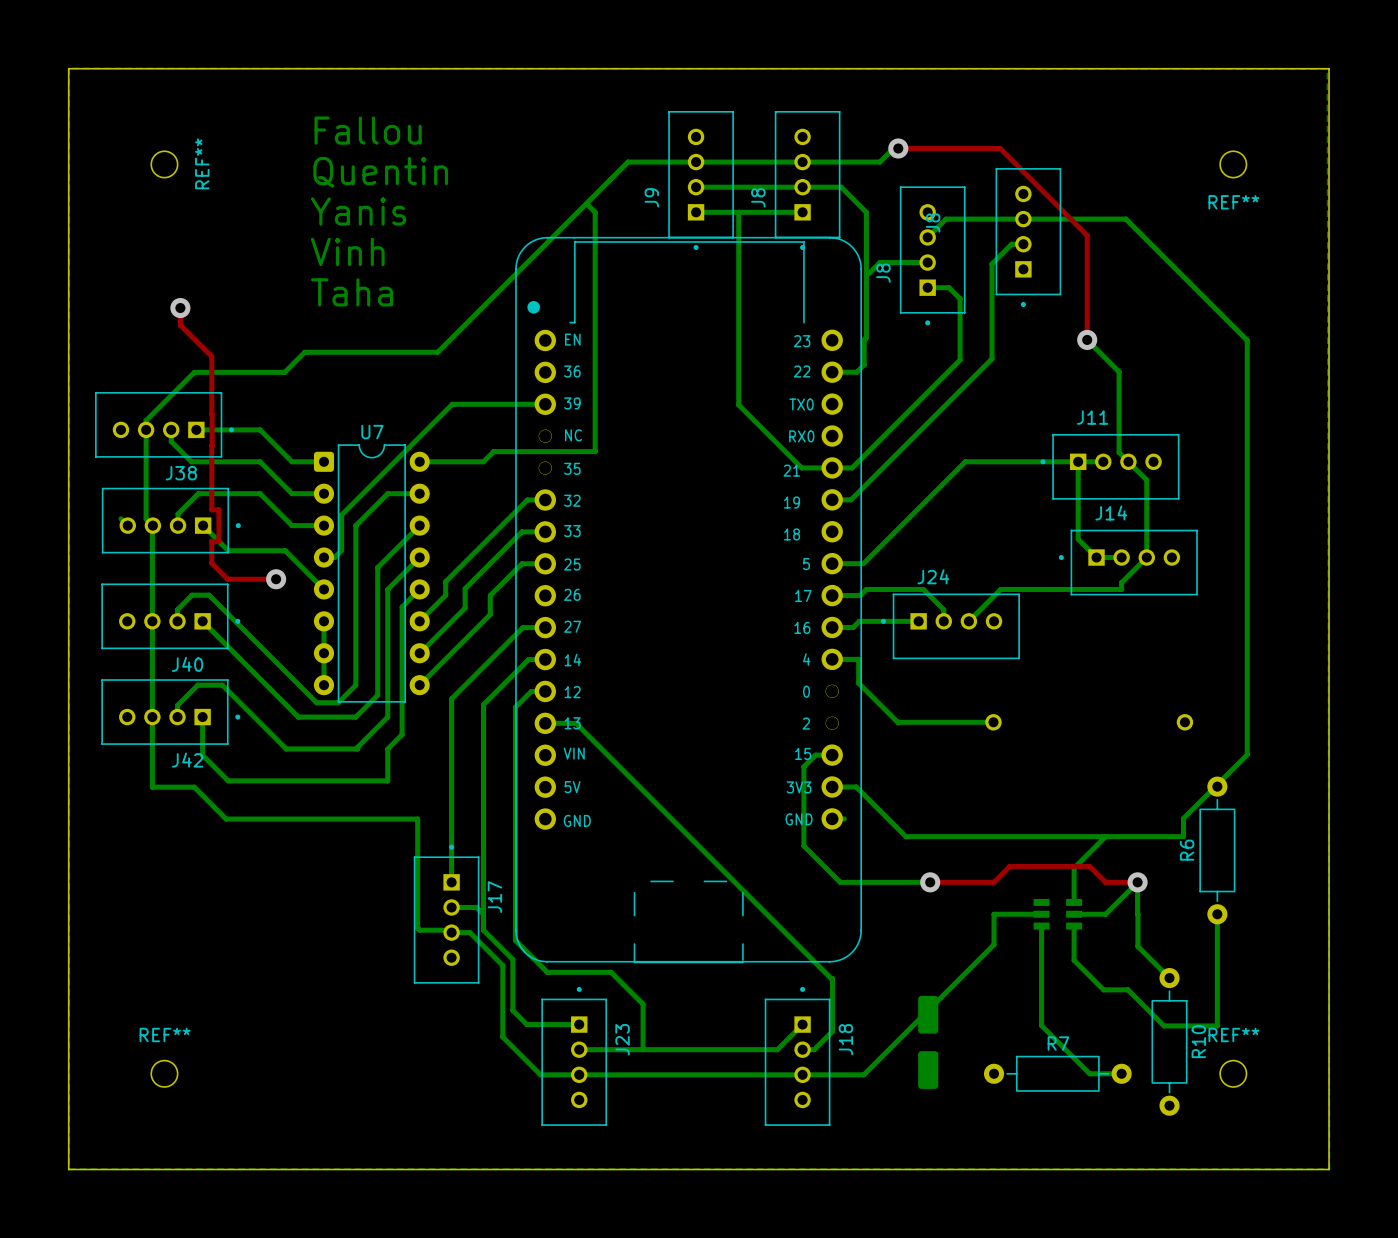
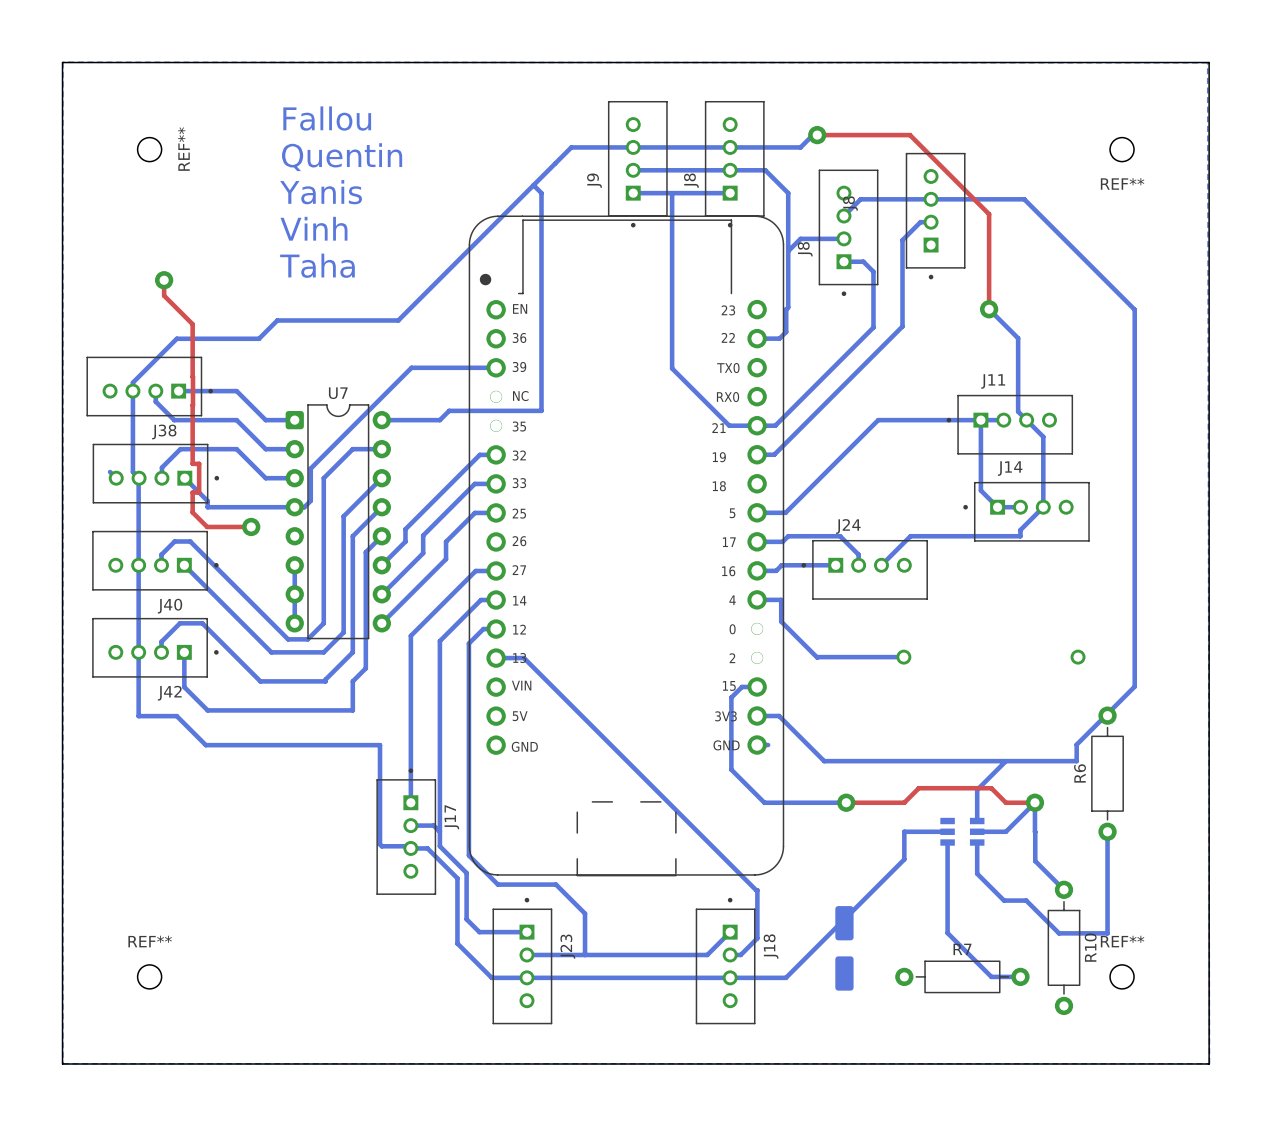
bottom track: (228, 550) (285, 550) (323, 589) -> (207, 501) (207, 507) (294, 507)

